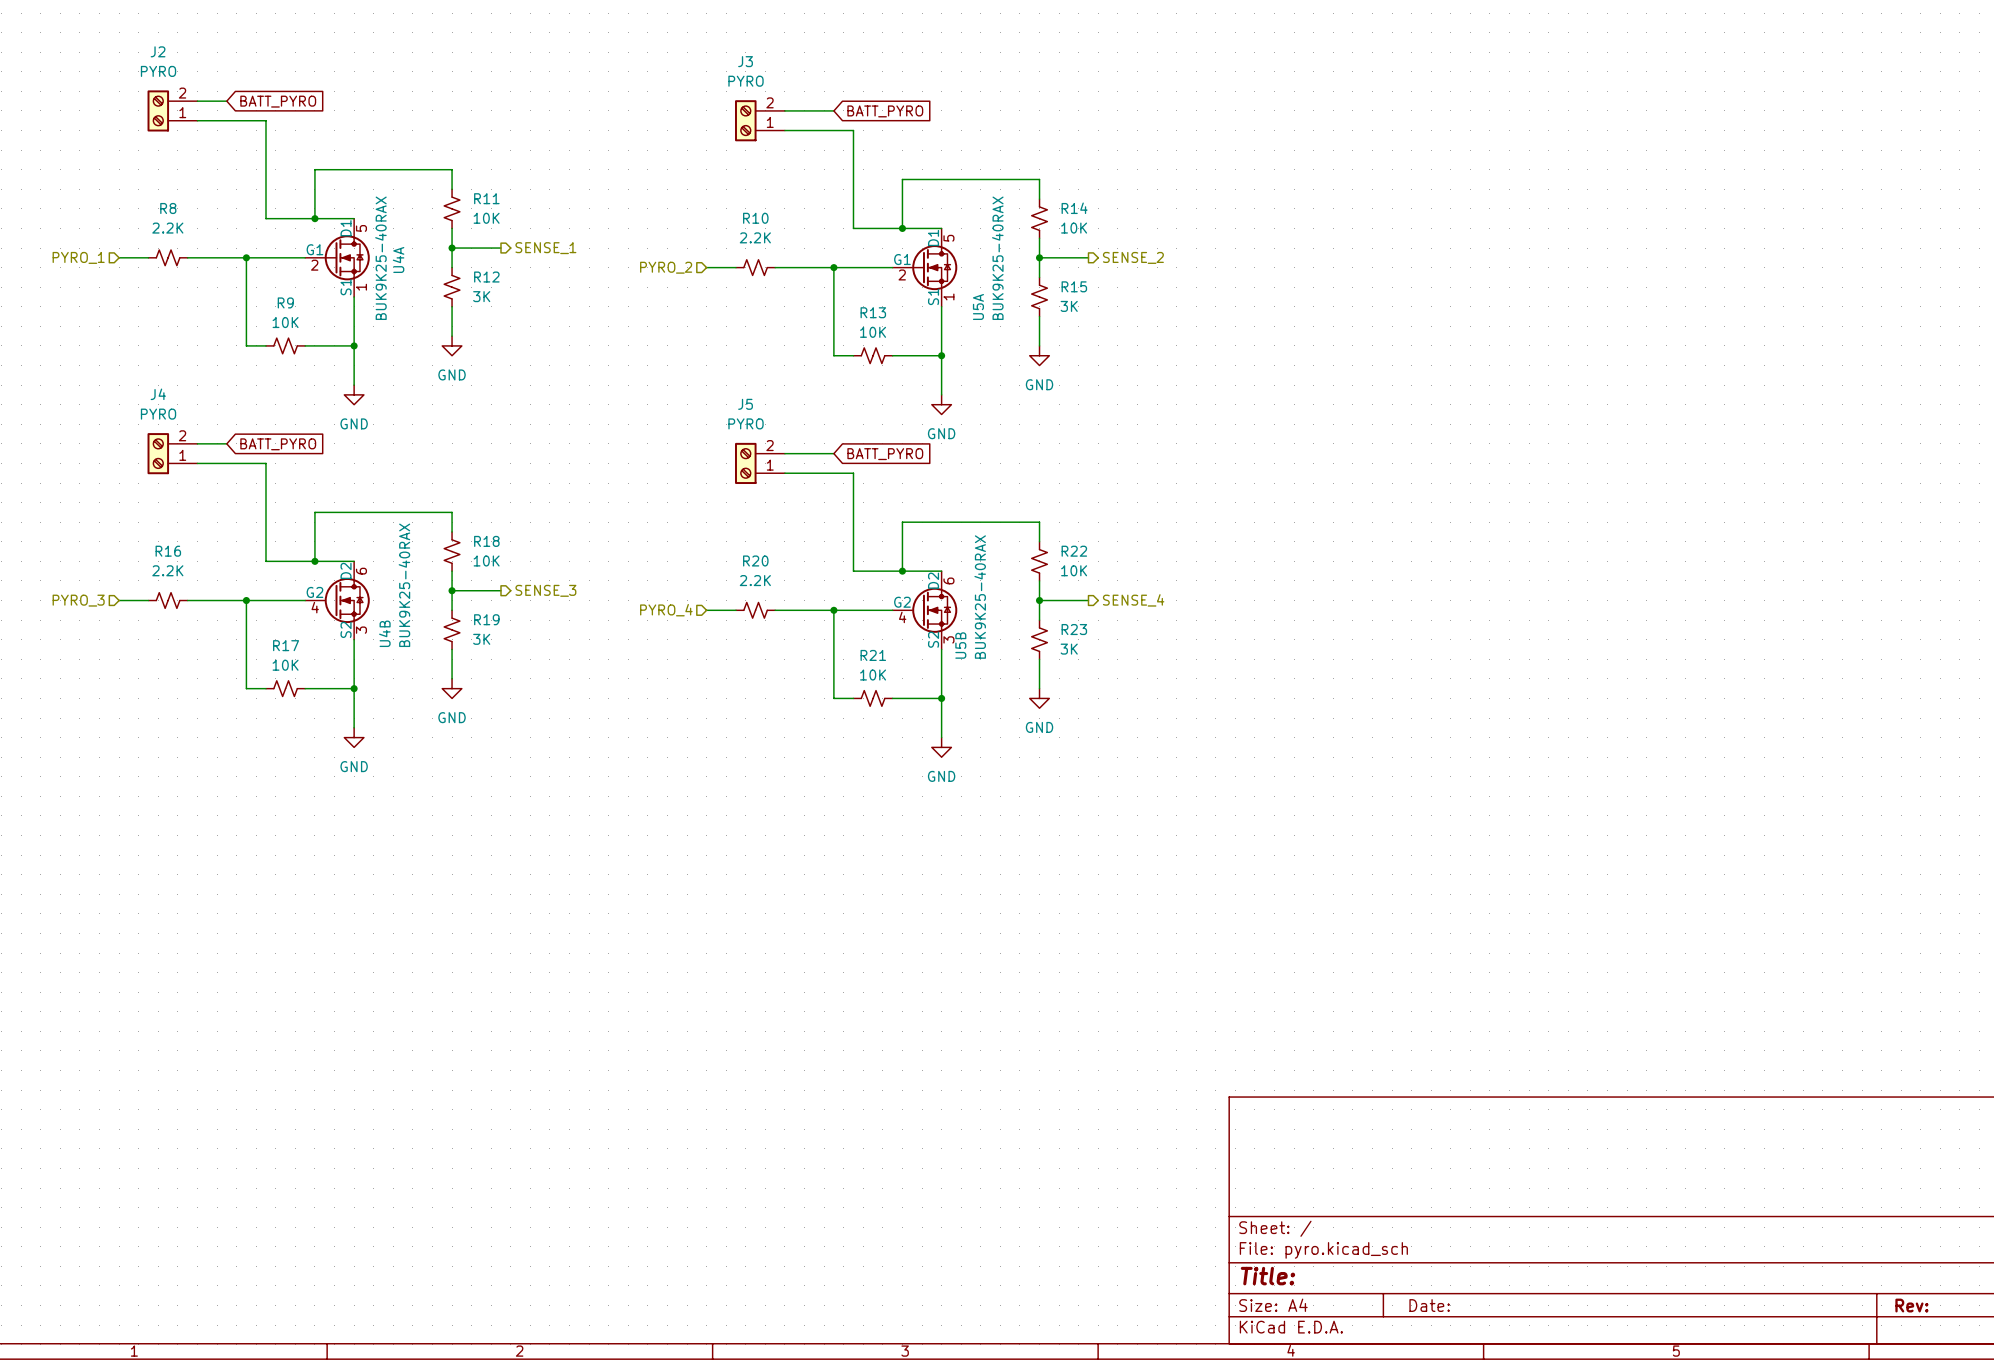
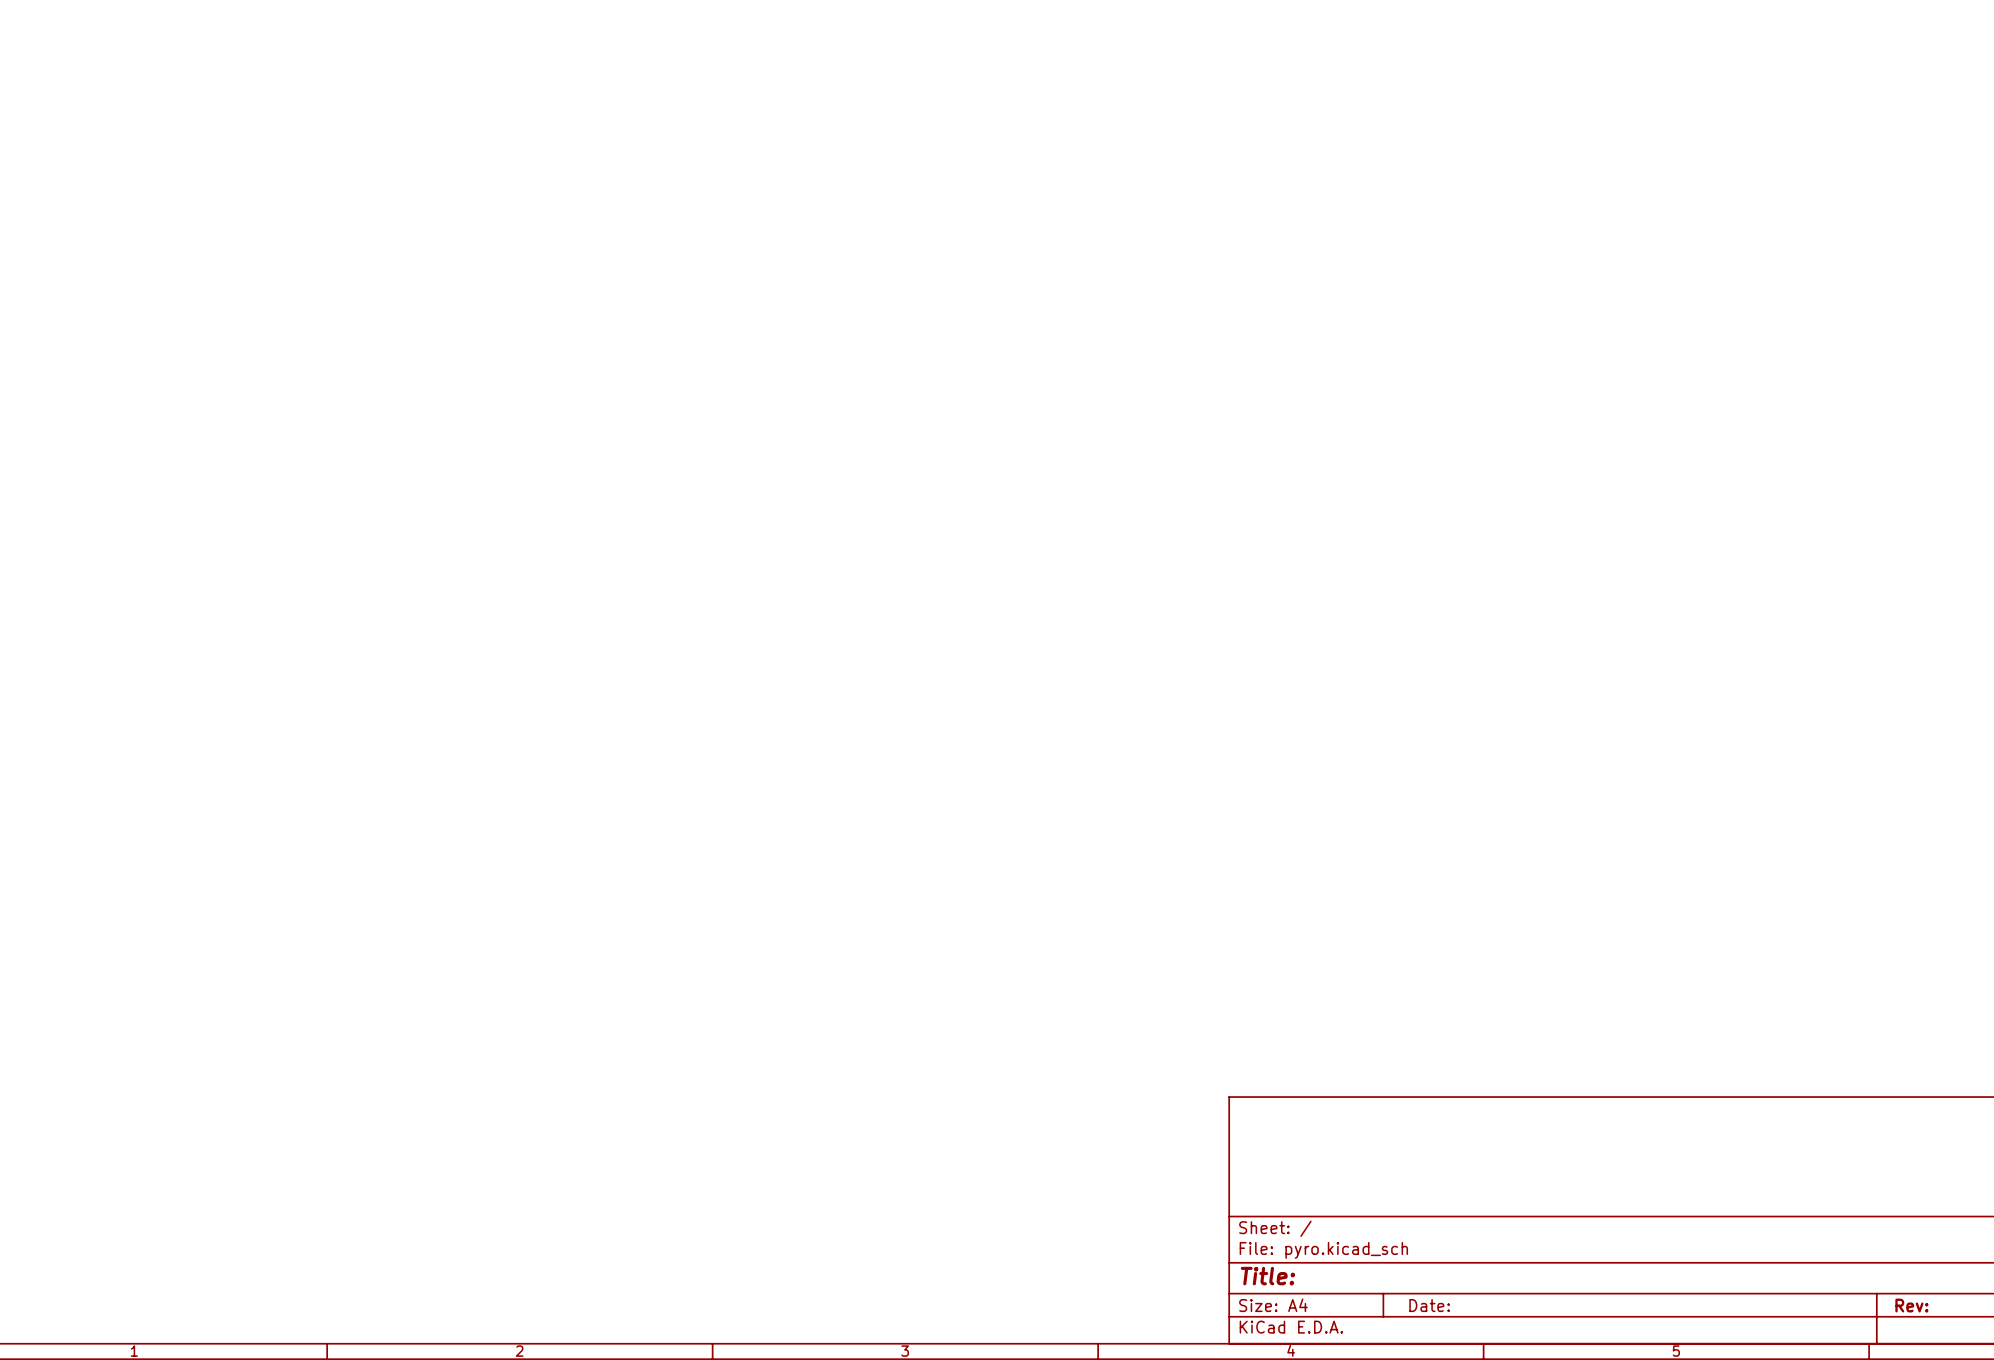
wire: (197, 101) (226, 101) -> none
global label: BATT_PYRO (278, 101) -> none
J2: PYRO (172, 110) -> none
wire: (784, 110) (833, 110) -> none
global label: BATT_PYRO (885, 111) -> none
wire: (197, 120) (265, 120) (265, 218) (354, 218) -> none
J3: PYRO (759, 120) -> none
wire: (784, 130) (853, 130) (853, 228) (941, 228) -> none
wire: (452, 189) (452, 169) (314, 169) (314, 218) -> none
wire: (1039, 199) (1039, 179) (902, 179) (902, 228) -> none
R11: 10K (452, 208) -> none
junction: (314, 218) -> none
R14: 10K (1039, 218) -> none
wire: (452, 228) (452, 267) -> none
junction: (902, 228) -> none
wire: (1039, 238) (1039, 277) -> none
wire: (452, 248) (500, 248) -> none
junction: (452, 248) -> none
hierarchical label: SENSE_1 (545, 248) -> none
hierarchical label: PYRO_1 (78, 257) -> none
wire: (119, 257) (148, 257) -> none
R8: 2.2K (168, 257) -> none
wire: (187, 257) (305, 257) -> none
wire: (246, 257) (246, 345) (265, 345) -> none
junction: (246, 257) -> none
U4A: BUK9K25-40RAX (337, 257) -> none
wire: (1039, 257) (1088, 257) -> none
junction: (1039, 257) -> none
hierarchical label: SENSE_2 (1133, 257) -> none
hierarchical label: PYRO_2 (666, 267) -> none
wire: (706, 267) (735, 267) -> none
R10: 2.2K (755, 267) -> none
wire: (775, 267) (892, 267) -> none
wire: (833, 267) (833, 355) (853, 355) -> none
junction: (833, 267) -> none
U5A: BUK9K25-40RAX (924, 267) -> none
R12: 3K (452, 287) -> none
wire: (354, 296) (354, 385) -> none
R15: 3K (1039, 296) -> none
wire: (452, 306) (452, 336) -> none
wire: (941, 306) (941, 394) -> none
wire: (1039, 316) (1039, 345) -> none
R9: 10K (285, 345) -> none
wire: (305, 345) (354, 345) -> none
junction: (354, 345) -> none
power symbol: GND (452, 345) -> none
R13: 10K (873, 355) -> none
wire: (892, 355) (941, 355) -> none
junction: (941, 355) -> none
power symbol: GND (1039, 355) -> none
power symbol: GND (354, 394) -> none
power symbol: GND (941, 404) -> none
wire: (197, 443) (226, 443) -> none
global label: BATT_PYRO (278, 444) -> none
J4: PYRO (172, 453) -> none
wire: (784, 453) (833, 453) -> none
global label: BATT_PYRO (885, 454) -> none
wire: (197, 463) (265, 463) (265, 561) (354, 561) -> none
J5: PYRO (759, 463) -> none
wire: (784, 473) (853, 473) (853, 571) (941, 571) -> none
wire: (452, 531) (452, 512) (314, 512) (314, 561) -> none
wire: (1039, 541) (1039, 522) (902, 522) (902, 571) -> none
R18: 10K (452, 551) -> none
junction: (314, 561) -> none
R22: 10K (1039, 561) -> none
wire: (452, 571) (452, 610) -> none
junction: (902, 571) -> none
wire: (1039, 580) (1039, 620) -> none
wire: (452, 590) (500, 590) -> none
junction: (452, 590) -> none
hierarchical label: SENSE_3 (545, 590) -> none
hierarchical label: PYRO_3 (78, 600) -> none
wire: (119, 600) (148, 600) -> none
R16: 2.2K (168, 600) -> none
wire: (187, 600) (305, 600) -> none
wire: (246, 600) (246, 688) (265, 688) -> none
junction: (246, 600) -> none
U4B: BUK9K25-40RAX (337, 600) -> none
wire: (1039, 600) (1088, 600) -> none
junction: (1039, 600) -> none
hierarchical label: SENSE_4 (1133, 600) -> none
hierarchical label: PYRO_4 (666, 610) -> none
wire: (706, 610) (735, 610) -> none
R20: 2.2K (755, 610) -> none
wire: (775, 610) (892, 610) -> none
wire: (833, 610) (833, 698) (853, 698) -> none
junction: (833, 610) -> none
U5B: BUK9K25-40RAX (924, 610) -> none
R19: 3K (452, 629) -> none
wire: (354, 639) (354, 727) -> none
R23: 3K (1039, 639) -> none
wire: (452, 649) (452, 678) -> none
wire: (941, 649) (941, 737) -> none
wire: (1039, 659) (1039, 688) -> none
R17: 10K (285, 688) -> none
wire: (305, 688) (354, 688) -> none
junction: (354, 688) -> none
power symbol: GND (452, 688) -> none
R21: 10K (873, 698) -> none
wire: (892, 698) (941, 698) -> none
junction: (941, 698) -> none
power symbol: GND (1039, 698) -> none
power symbol: GND (354, 737) -> none
power symbol: GND (941, 747) -> none

